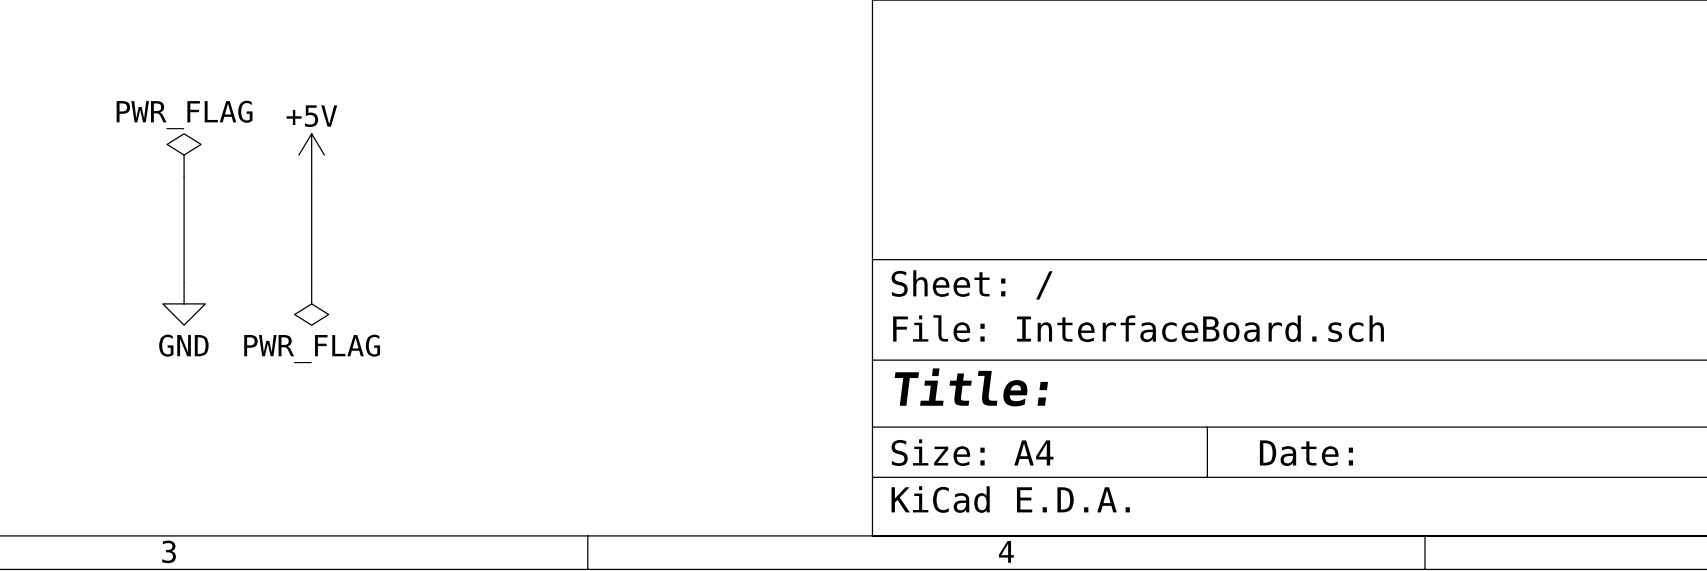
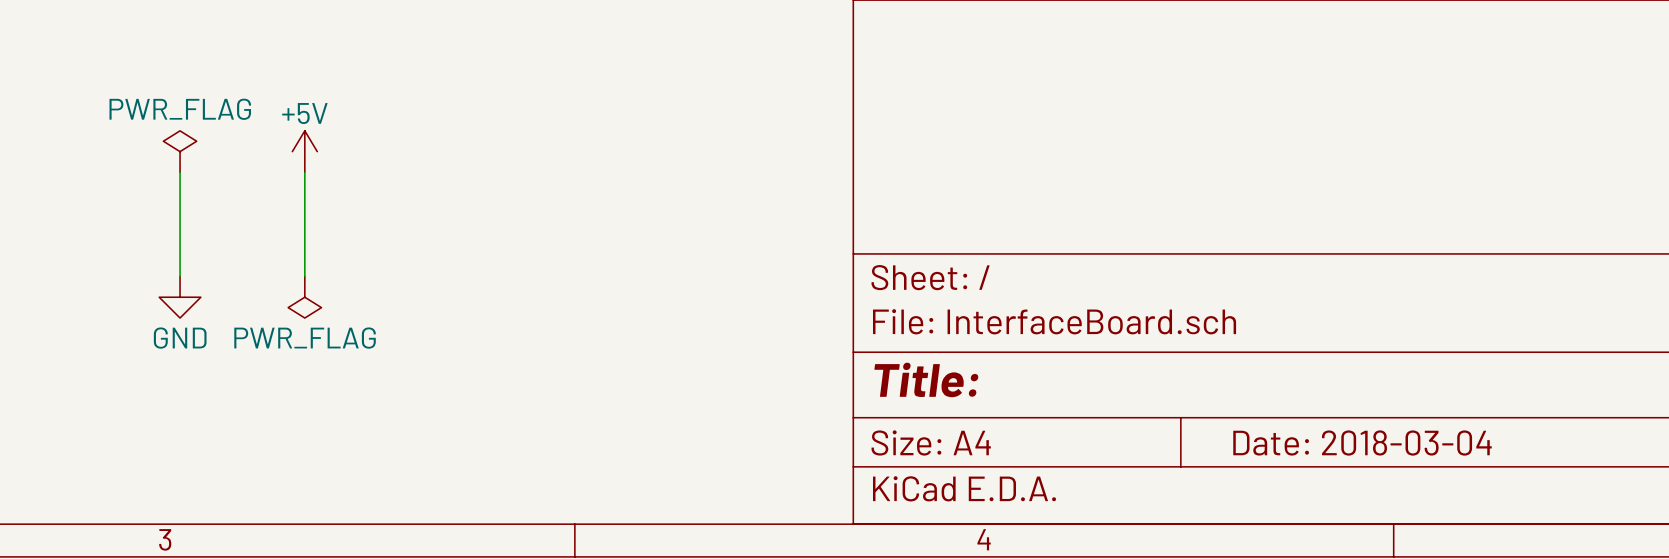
title block: Date: (1306, 453) -> Date: 2018-03-04 (1362, 443)

